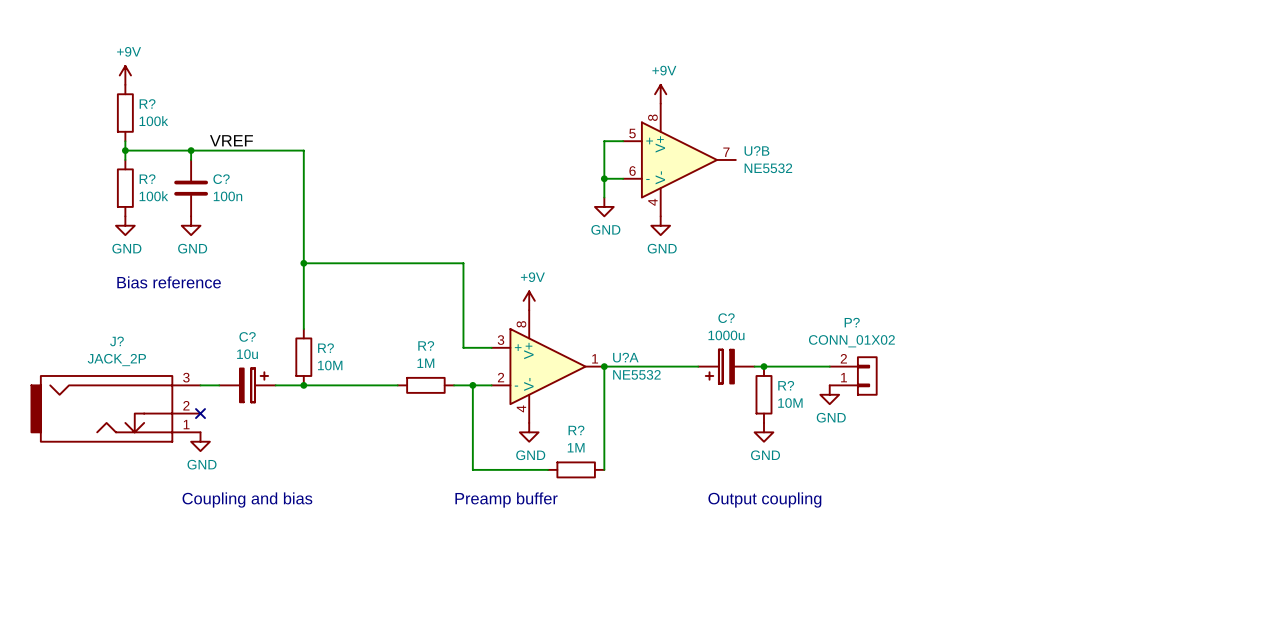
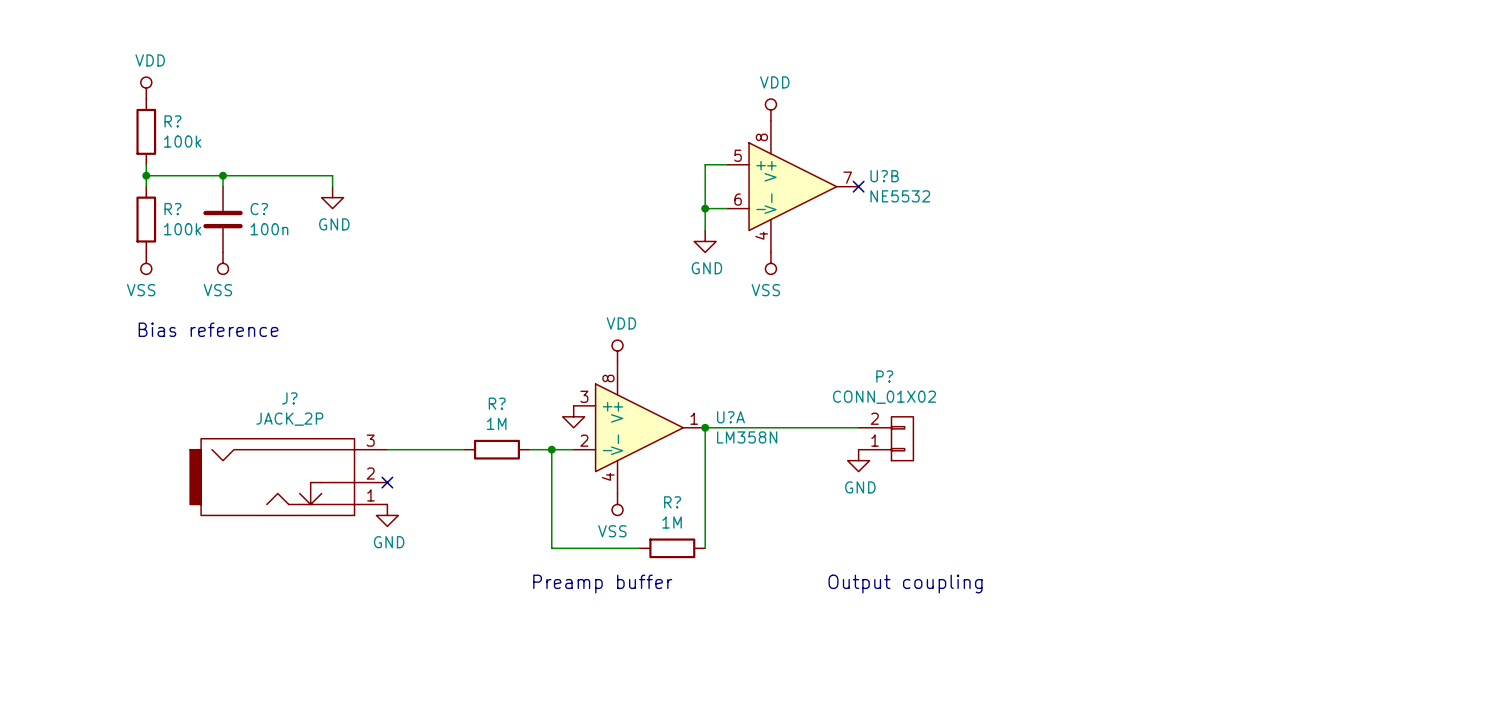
power symbol: +9V (125, 75) -> VDD (146, 88)
power symbol: +9V (660, 94) -> VDD (770, 109)
label: VREF (231, 140) -> none
wire: (285, 150) (303, 150) (303, 329) -> (332, 175) (332, 186)
no-connect mark: none -> (858, 186)
power symbol: none -> GND (332, 197)
power symbol: GND (125, 225) -> VSS (146, 263)
power symbol: GND (191, 225) -> VSS (223, 263)
power symbol: GND (660, 225) -> VSS (770, 263)
wire: (303, 263) (463, 263) (463, 347) (491, 347) -> none
junction: (303, 263) -> none
power symbol: +9V (529, 300) -> VDD (617, 351)
R?: 10M (303, 357) -> none
power symbol: none -> (573, 416)
C?: 1000u (726, 366) -> none
wire: (754, 366) (829, 366) -> none
junction: (763, 366) -> none
U?A value: NE5532 (636, 374) -> LM358N (747, 437)
P? position: (853, 375) -> (886, 438)
C?: 10u (247, 385) -> none
junction: (303, 385) -> none
power symbol: none -> GND (858, 460)
R?: 10M (763, 394) -> none
power symbol: GND (829, 394) -> none
J? position: (115, 408) -> (288, 477)
no-connect mark: (200, 413) -> none
no-connect mark: none -> (387, 482)
power symbol: GND (529, 432) -> VSS (617, 504)
power symbol: GND (763, 432) -> none
power symbol position: GND (200, 441) -> GND (387, 515)
text: Coupling and bias (247, 500) -> none

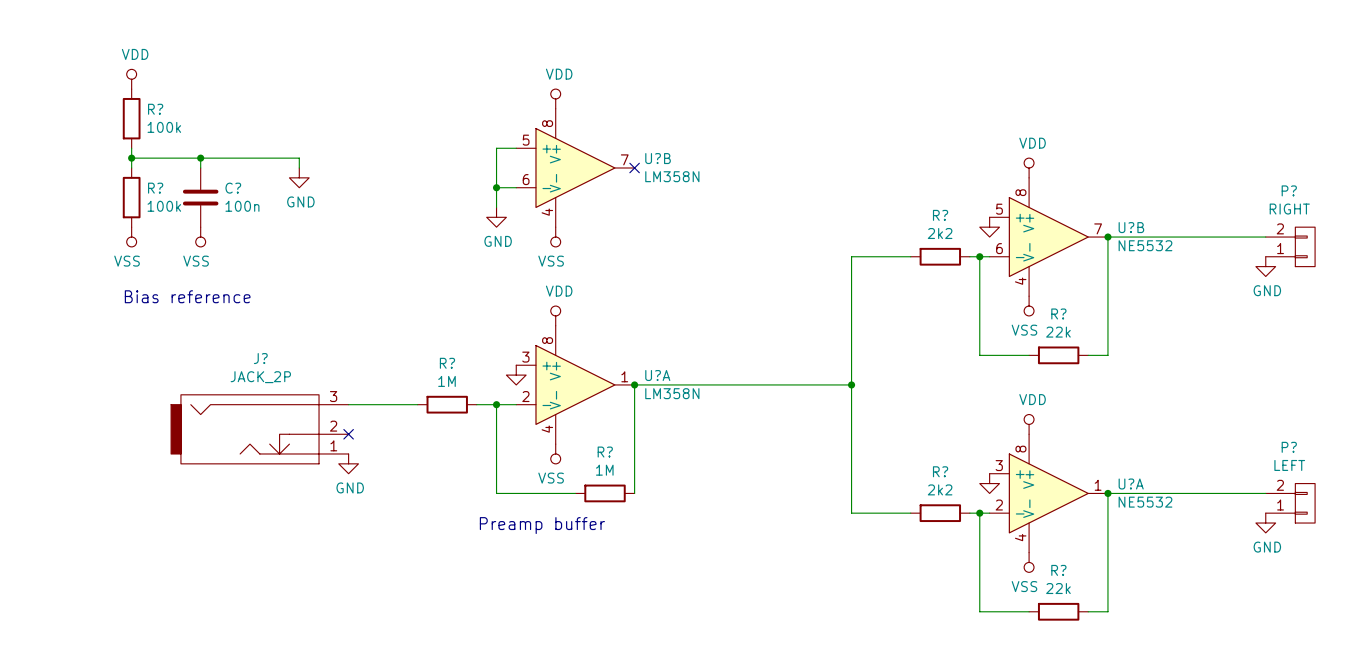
power symbol position: VDD (770, 109) -> VDD (555, 98)
wire: (727, 164) (705, 164) (705, 230) -> (516, 148) (496, 148) (496, 207)
U?B: none -> LM358N (575, 168)
no-connect mark: none -> (634, 168)
U?B: NE5532 (792, 186) -> none
no-connect mark: (858, 186) -> none
power symbol: none -> VDD (1029, 168)
junction: none -> (496, 187)
wire: (705, 208) (727, 208) -> (496, 187) (516, 187)
junction: (705, 208) -> none
power symbol position: GND (705, 241) -> GND (496, 217)
power symbol: none -> (989, 227)
power symbol position: VSS (770, 263) -> VSS (555, 237)
U?B: none -> NE5532 (1048, 237)
junction: none -> (1107, 237)
wire: none -> (1265, 237) (1107, 237) (1107, 355) (1088, 355)
P?: none -> RIGHT (1290, 246)
wire: none -> (910, 256) (851, 256) (851, 513) (910, 513)
R?: none -> 2k2 (940, 256)
wire: none -> (969, 256) (989, 256)
wire: none -> (979, 256) (979, 355) (1029, 355)
junction: none -> (979, 256)
power symbol: none -> GND (1265, 266)
power symbol: none -> VSS (1029, 306)
R?: none -> 22k (1058, 355)
wire: none -> (772, 384) (851, 384)
junction: none -> (851, 384)
P?: CONN_01X02 (886, 438) -> none
power symbol: GND (858, 460) -> none
power symbol: none -> VDD (1029, 424)
power symbol: none -> (989, 483)
U?A: none -> NE5532 (1048, 493)
junction: none -> (1107, 493)
wire: none -> (1265, 493) (1107, 493) (1107, 611) (1088, 611)
P?: none -> LEFT (1290, 503)
R?: none -> 2k2 (940, 513)
wire: none -> (969, 513) (989, 513)
wire: none -> (979, 513) (979, 611) (1029, 611)
junction: none -> (979, 513)
power symbol: none -> GND (1265, 523)
text: Output coupling (905, 584) -> none
power symbol: none -> VSS (1029, 562)
R?: none -> 22k (1058, 611)

